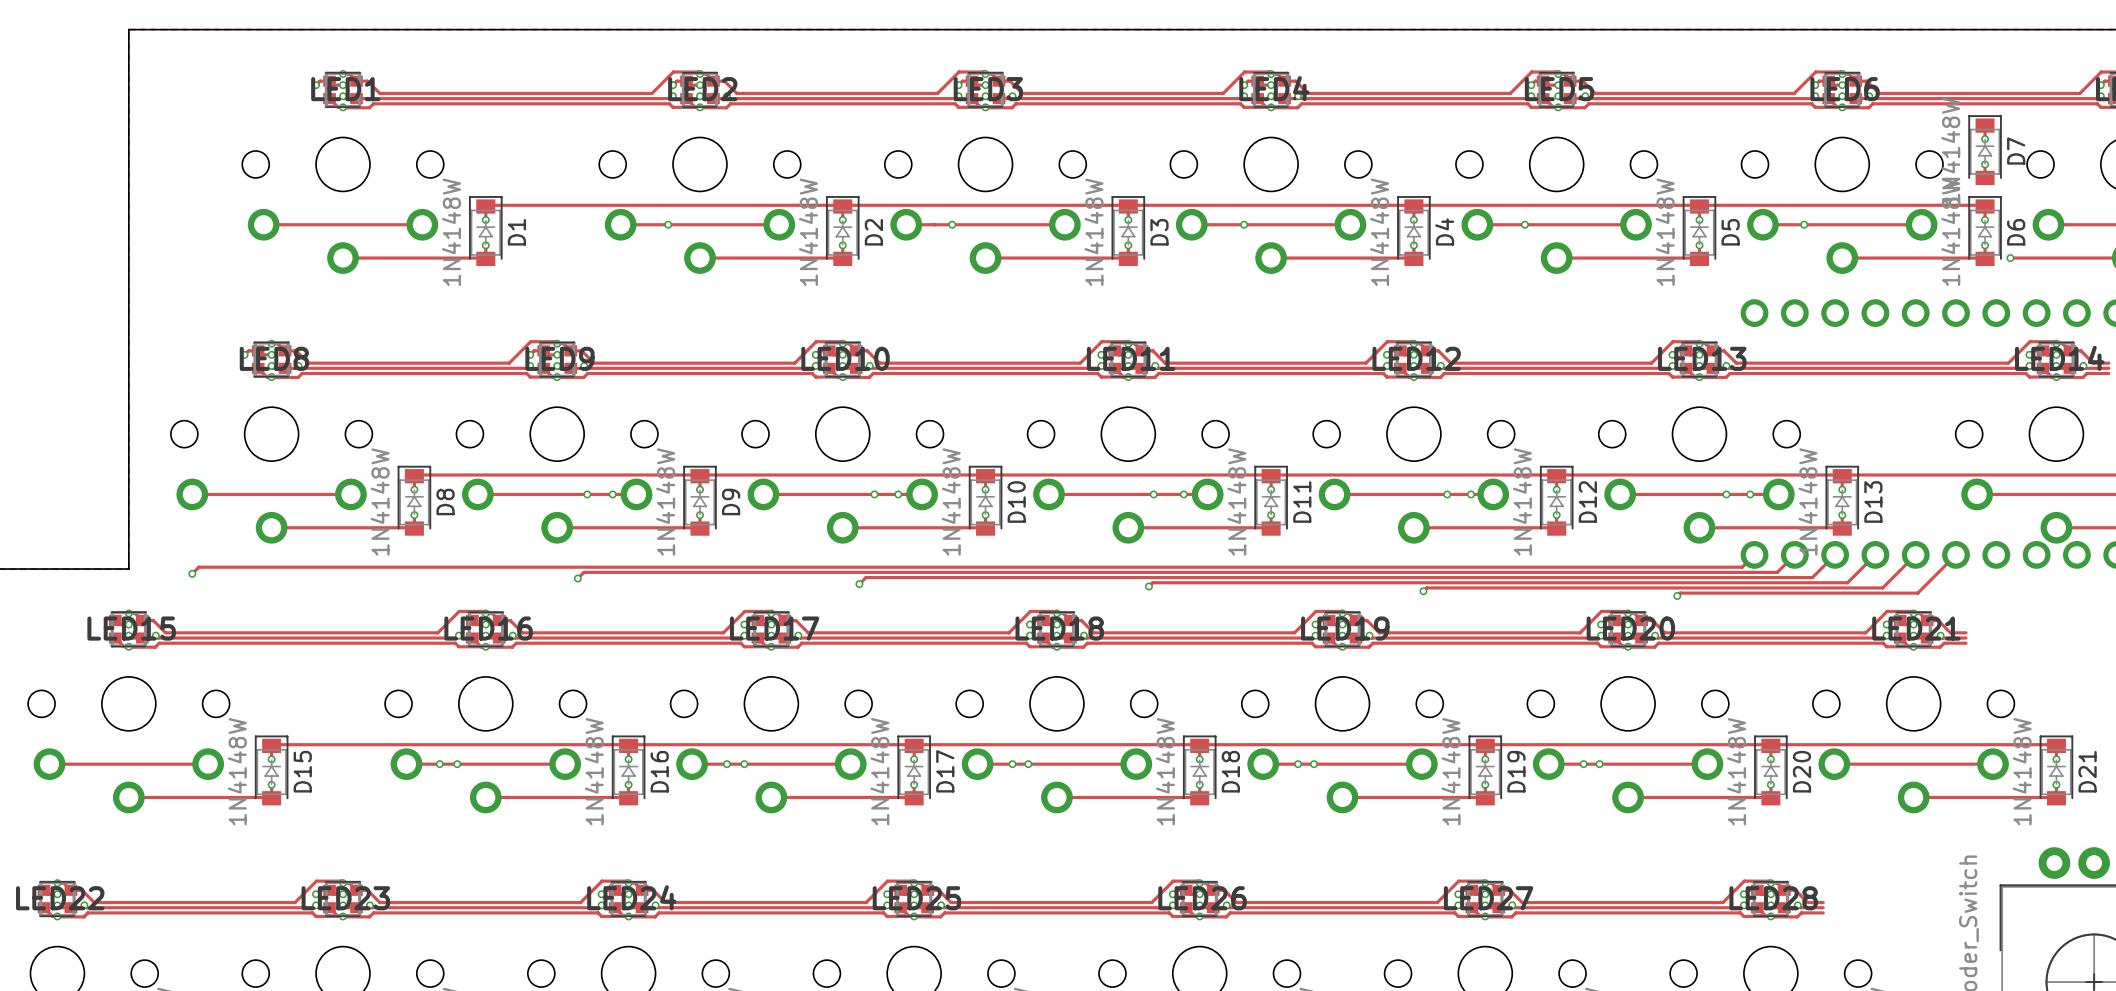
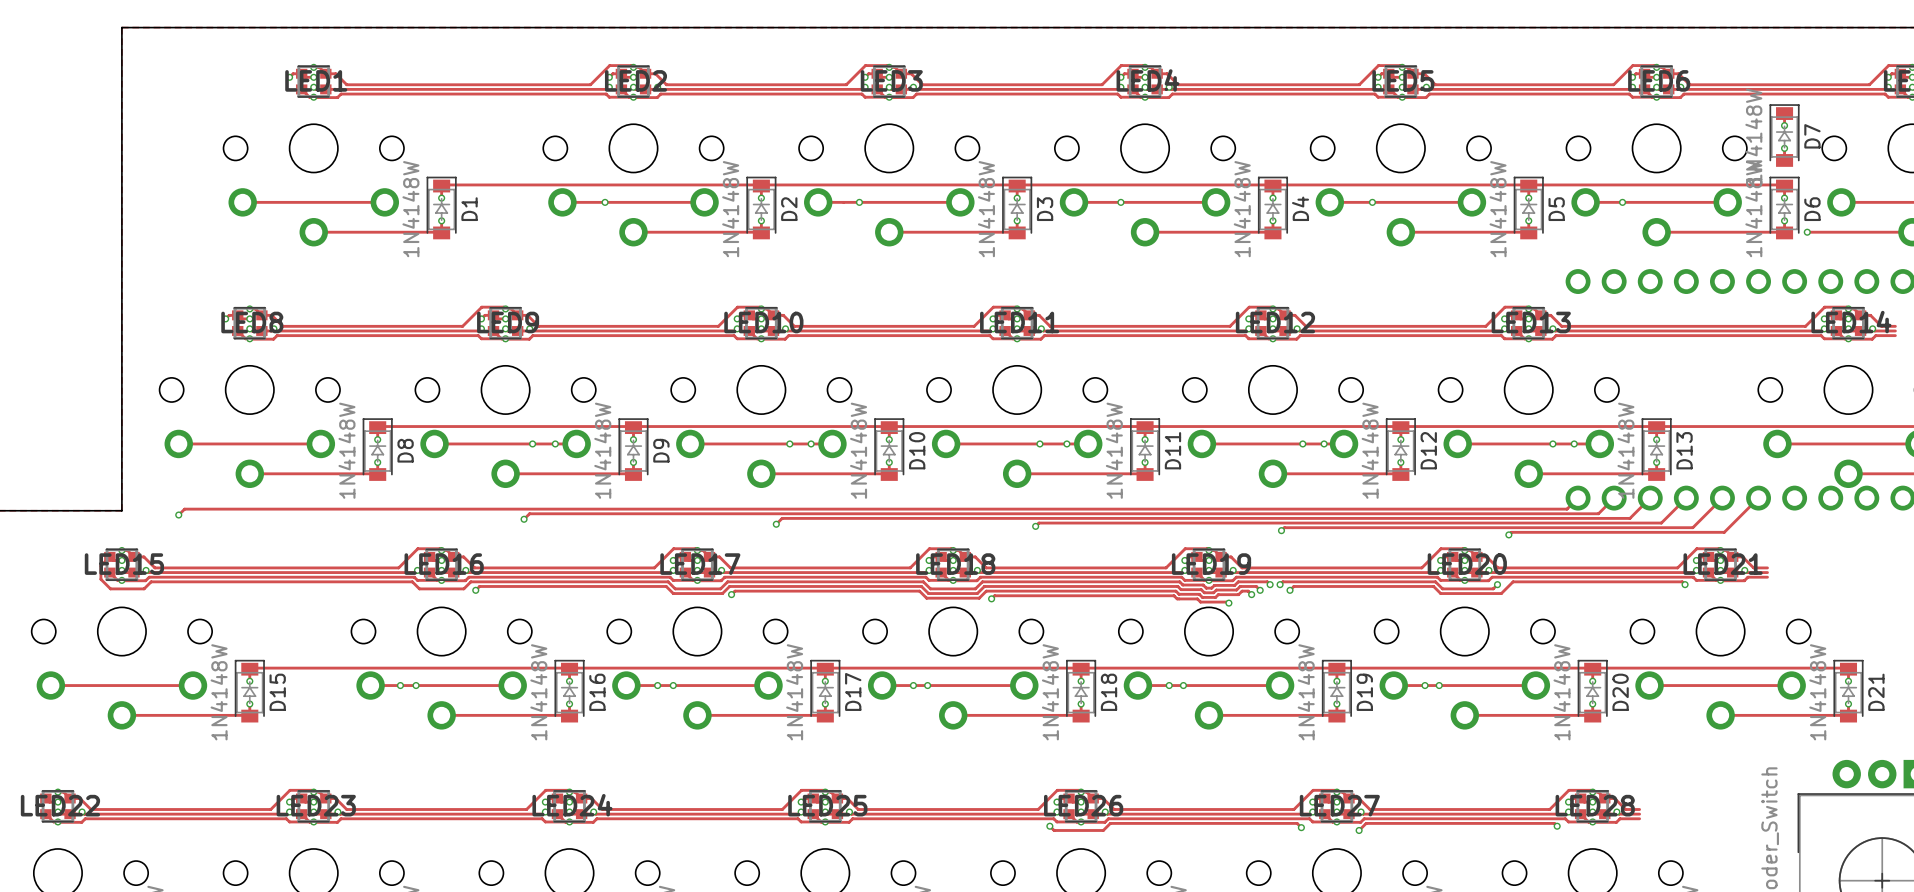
track: none -> (109, 556) (100, 565) (100, 579) (110, 588) (144, 588) (151, 581) (412, 581) (419, 588) (463, 588) (470, 581) (668, 581) (675, 588) (720, 588) (727, 581) (923, 581) (930, 588) (975, 588) (982, 581) (1179, 581) (1182, 585) (1203, 585) (1206, 588) (1211, 588) (1214, 585) (1234, 585) (1238, 581) (1267, 581) (1270, 584)
via: none -> (1270, 584)
track: none -> (1280, 584) (1282, 581) (1435, 581) (1442, 588) (1493, 588) (1497, 584)
via: none -> (1280, 584)
via: none -> (1497, 584)
track: none -> (1685, 584) (1682, 581) (1513, 581) (1501, 593) (1440, 593) (1433, 586) (1293, 586) (1290, 590)
via: none -> (1685, 584)
track: none -> (475, 590) (479, 586) (666, 586) (673, 593) (722, 593) (729, 586) (921, 586) (928, 593) (977, 593) (984, 586) (1177, 586) (1181, 589) (1201, 589) (1204, 592) (1213, 592) (1216, 590) (1236, 590) (1240, 586) (1256, 586) (1260, 590)
via: none -> (475, 590)
via: none -> (1260, 590)
via: none -> (1290, 590)
track: none -> (731, 594) (735, 591) (919, 591) (926, 598) (979, 598) (986, 591) (1175, 591) (1179, 594) (1199, 594) (1202, 597) (1215, 597) (1218, 594) (1238, 594) (1242, 591) (1248, 591) (1251, 594)
via: none -> (731, 594)
via: none -> (1251, 594)
track: none -> (991, 598) (994, 595) (1174, 595) (1177, 598) (1197, 598) (1200, 602) (1228, 603)
via: none -> (991, 598)
via: none -> (1228, 603)
track: none -> (1049, 826) (1054, 830) (1103, 830) (1110, 823) (1297, 823) (1301, 827)
via: none -> (1049, 826)
track: none -> (1557, 826) (1554, 823) (1366, 823) (1359, 830)
via: none -> (1557, 826)
via: none -> (1301, 827)
via: none -> (1359, 830)

